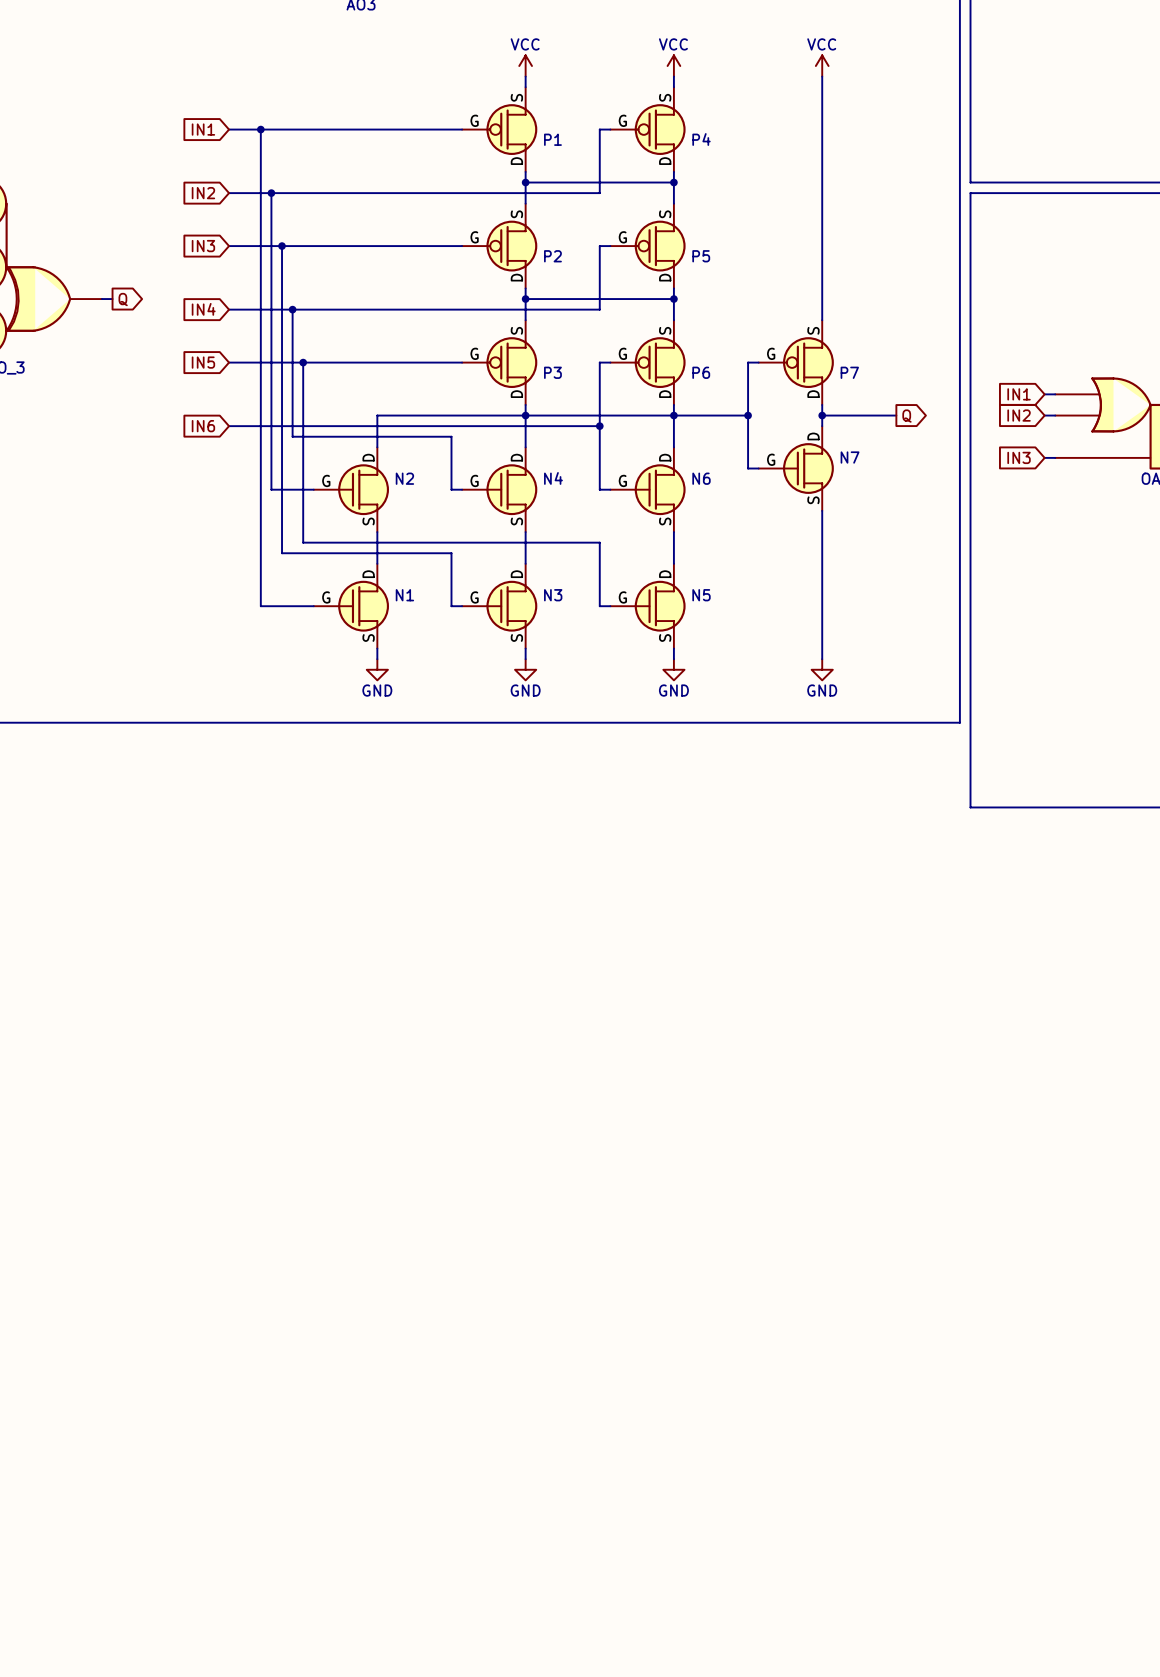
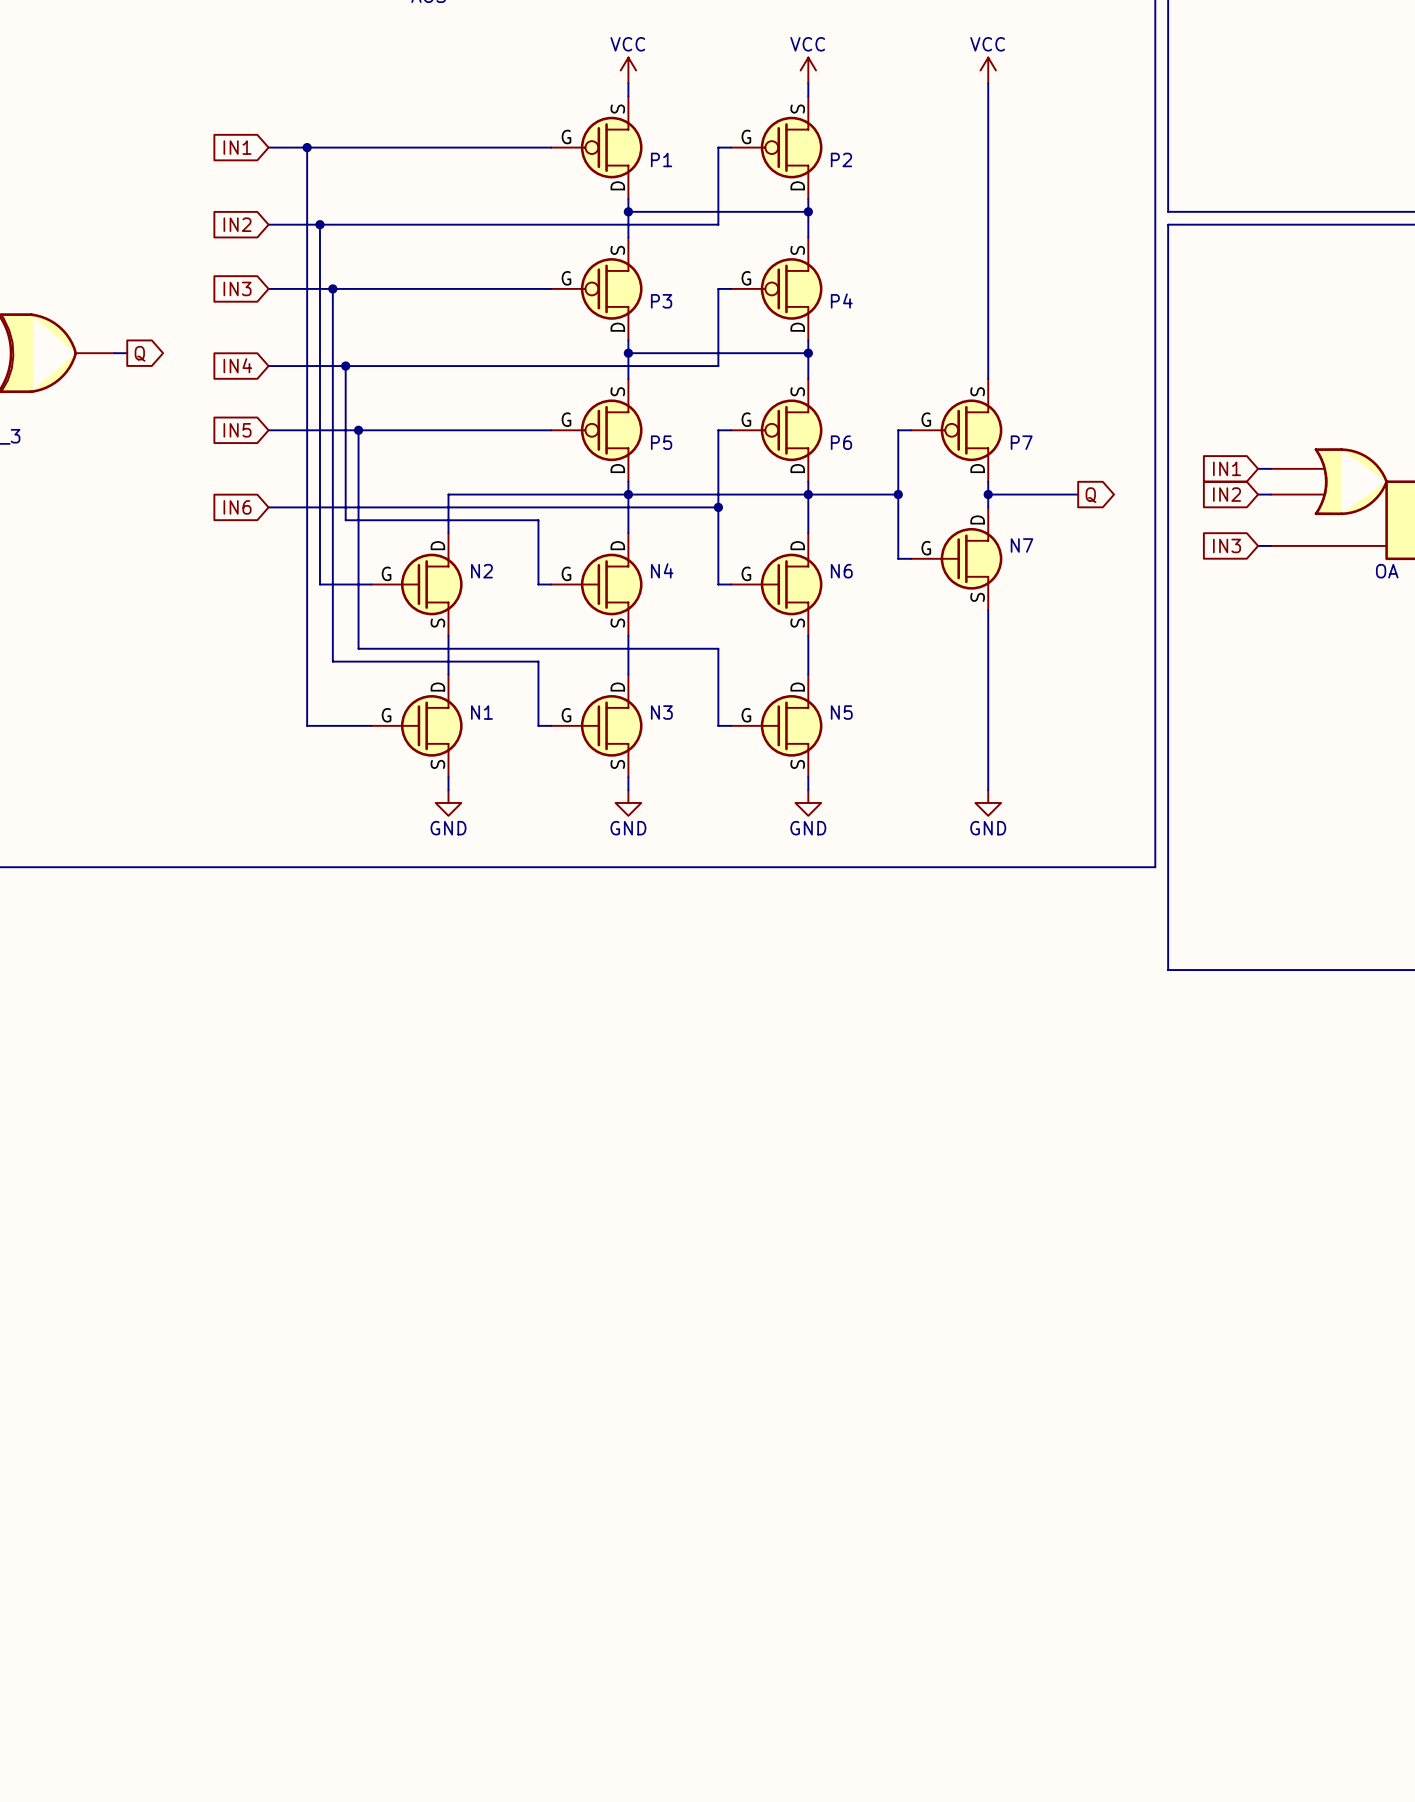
P4 name: P4 (701, 139) -> P2 (841, 159)
P2 name: P2 (552, 256) -> P3 (661, 301)
P5 name: P5 (701, 256) -> P4 (841, 301)
P3 name: P3 (552, 372) -> P5 (661, 442)

